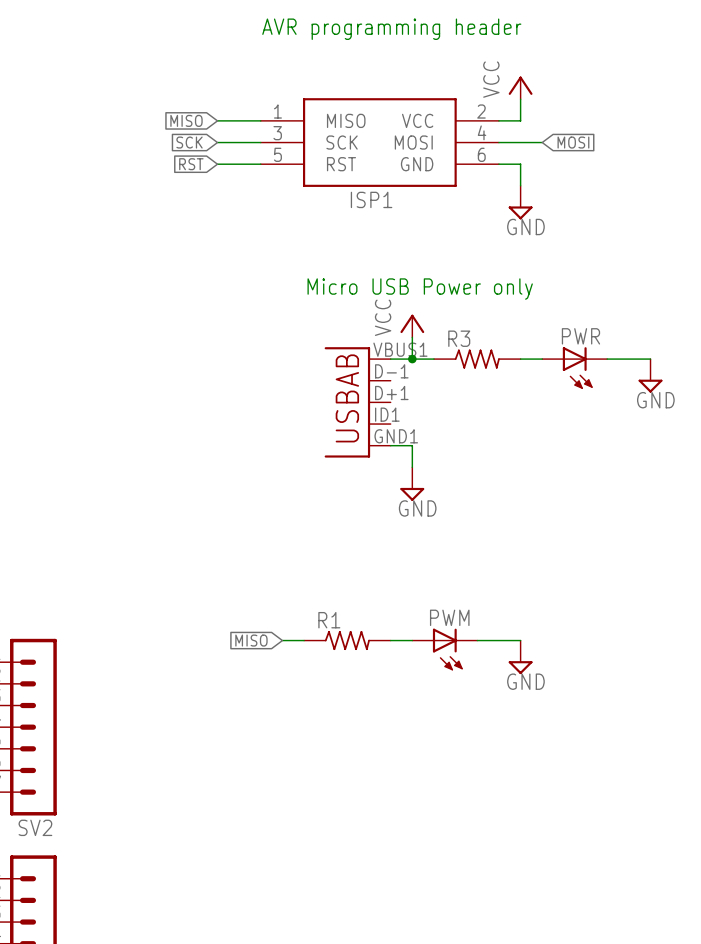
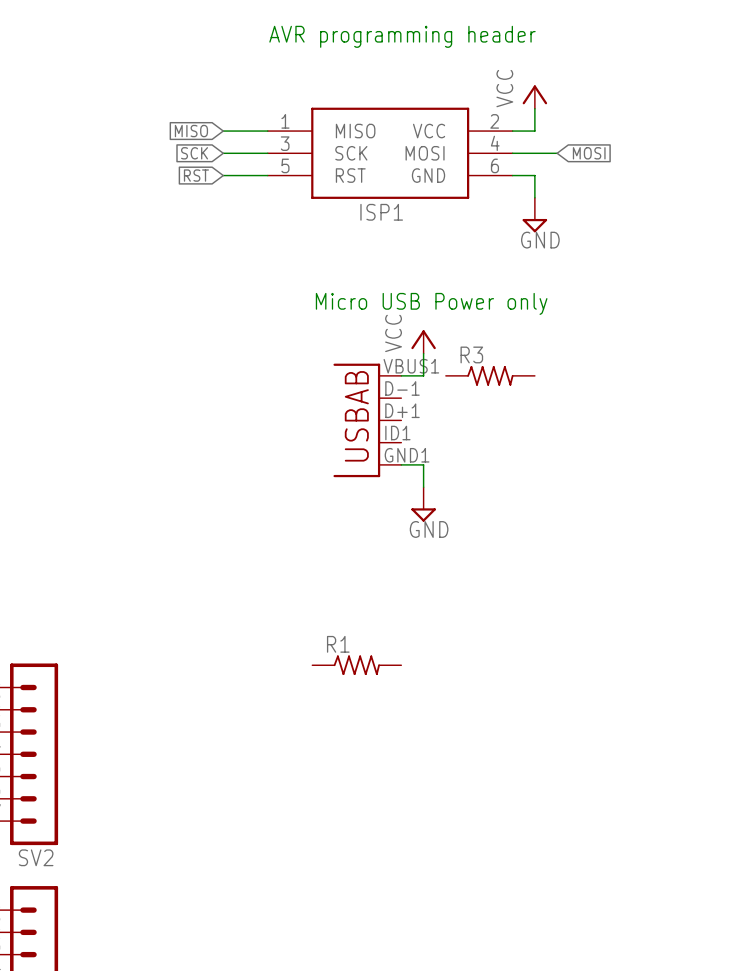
wire: (412, 359) (433, 359) -> none
junction: (412, 359) -> none
wire: (520, 359) (542, 359) -> none
wire: (607, 359) (650, 359) -> none
PWR: (574, 368) -> none
power symbol: GND (650, 375) -> none
global label: MISO (251, 640) -> none
wire: (282, 640) (304, 640) -> none
wire: (390, 640) (412, 640) -> none
wire: (477, 640) (520, 640) -> none
PWM: (444, 649) -> none
power symbol: GND (520, 657) -> none

